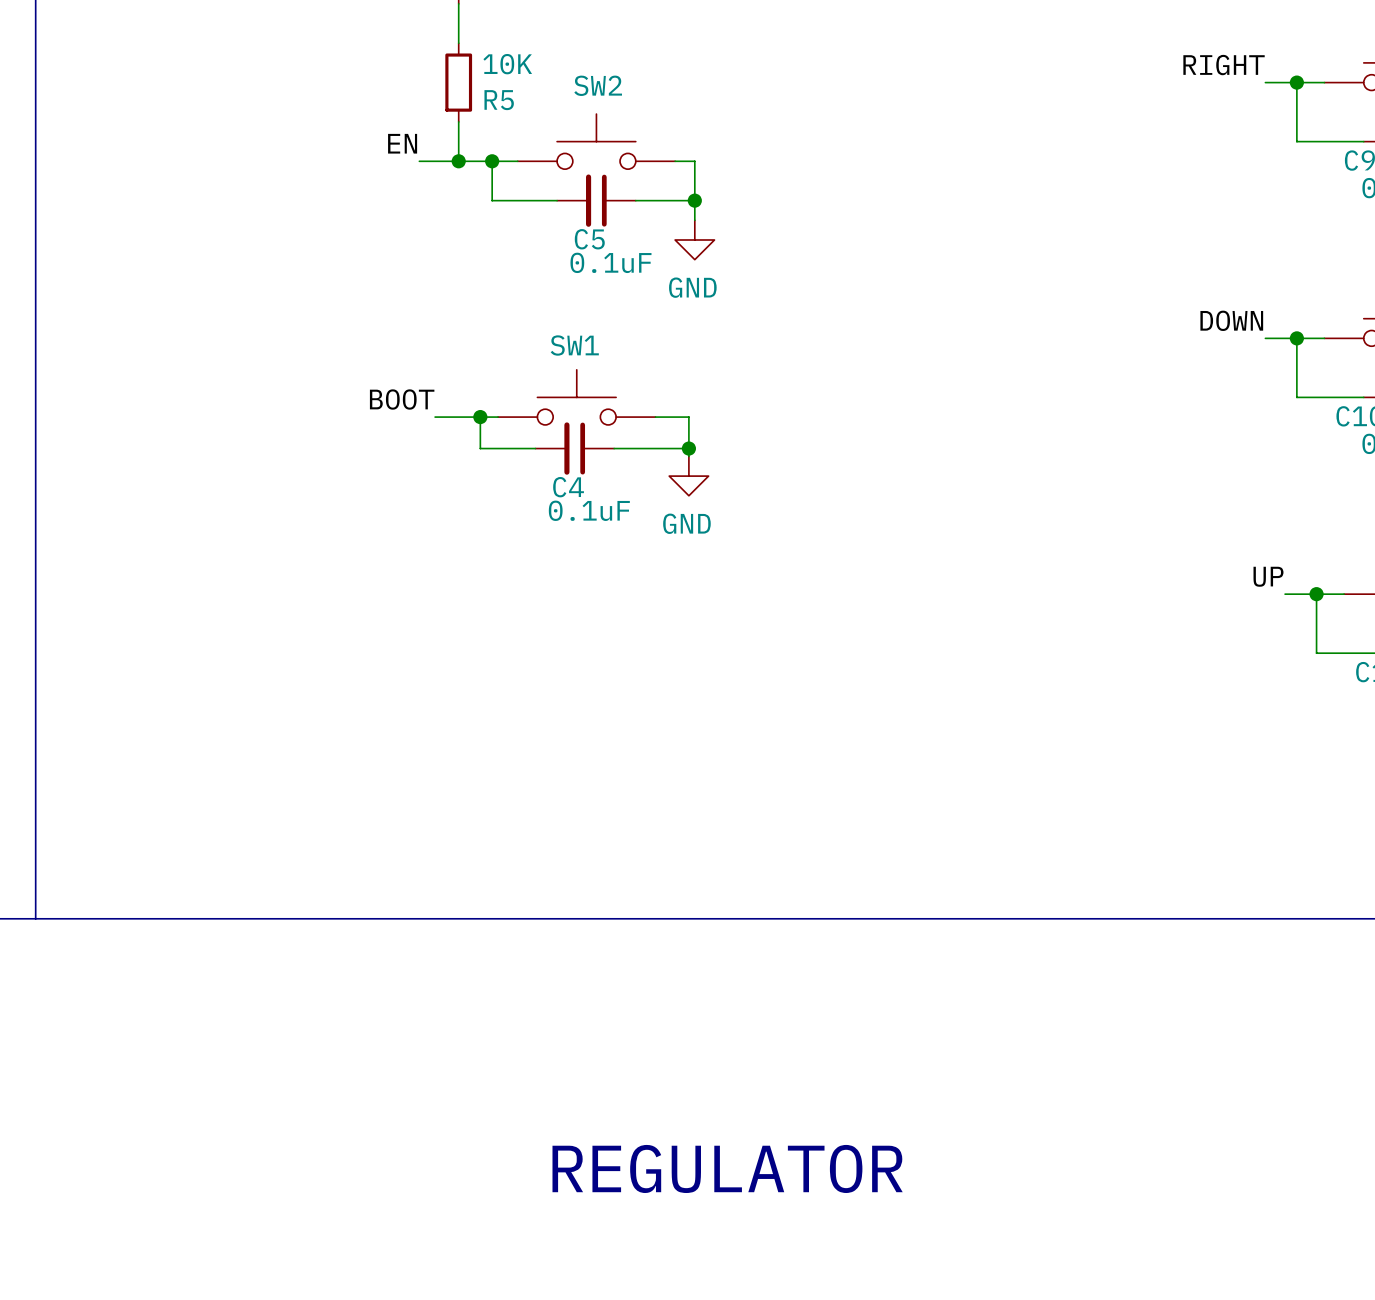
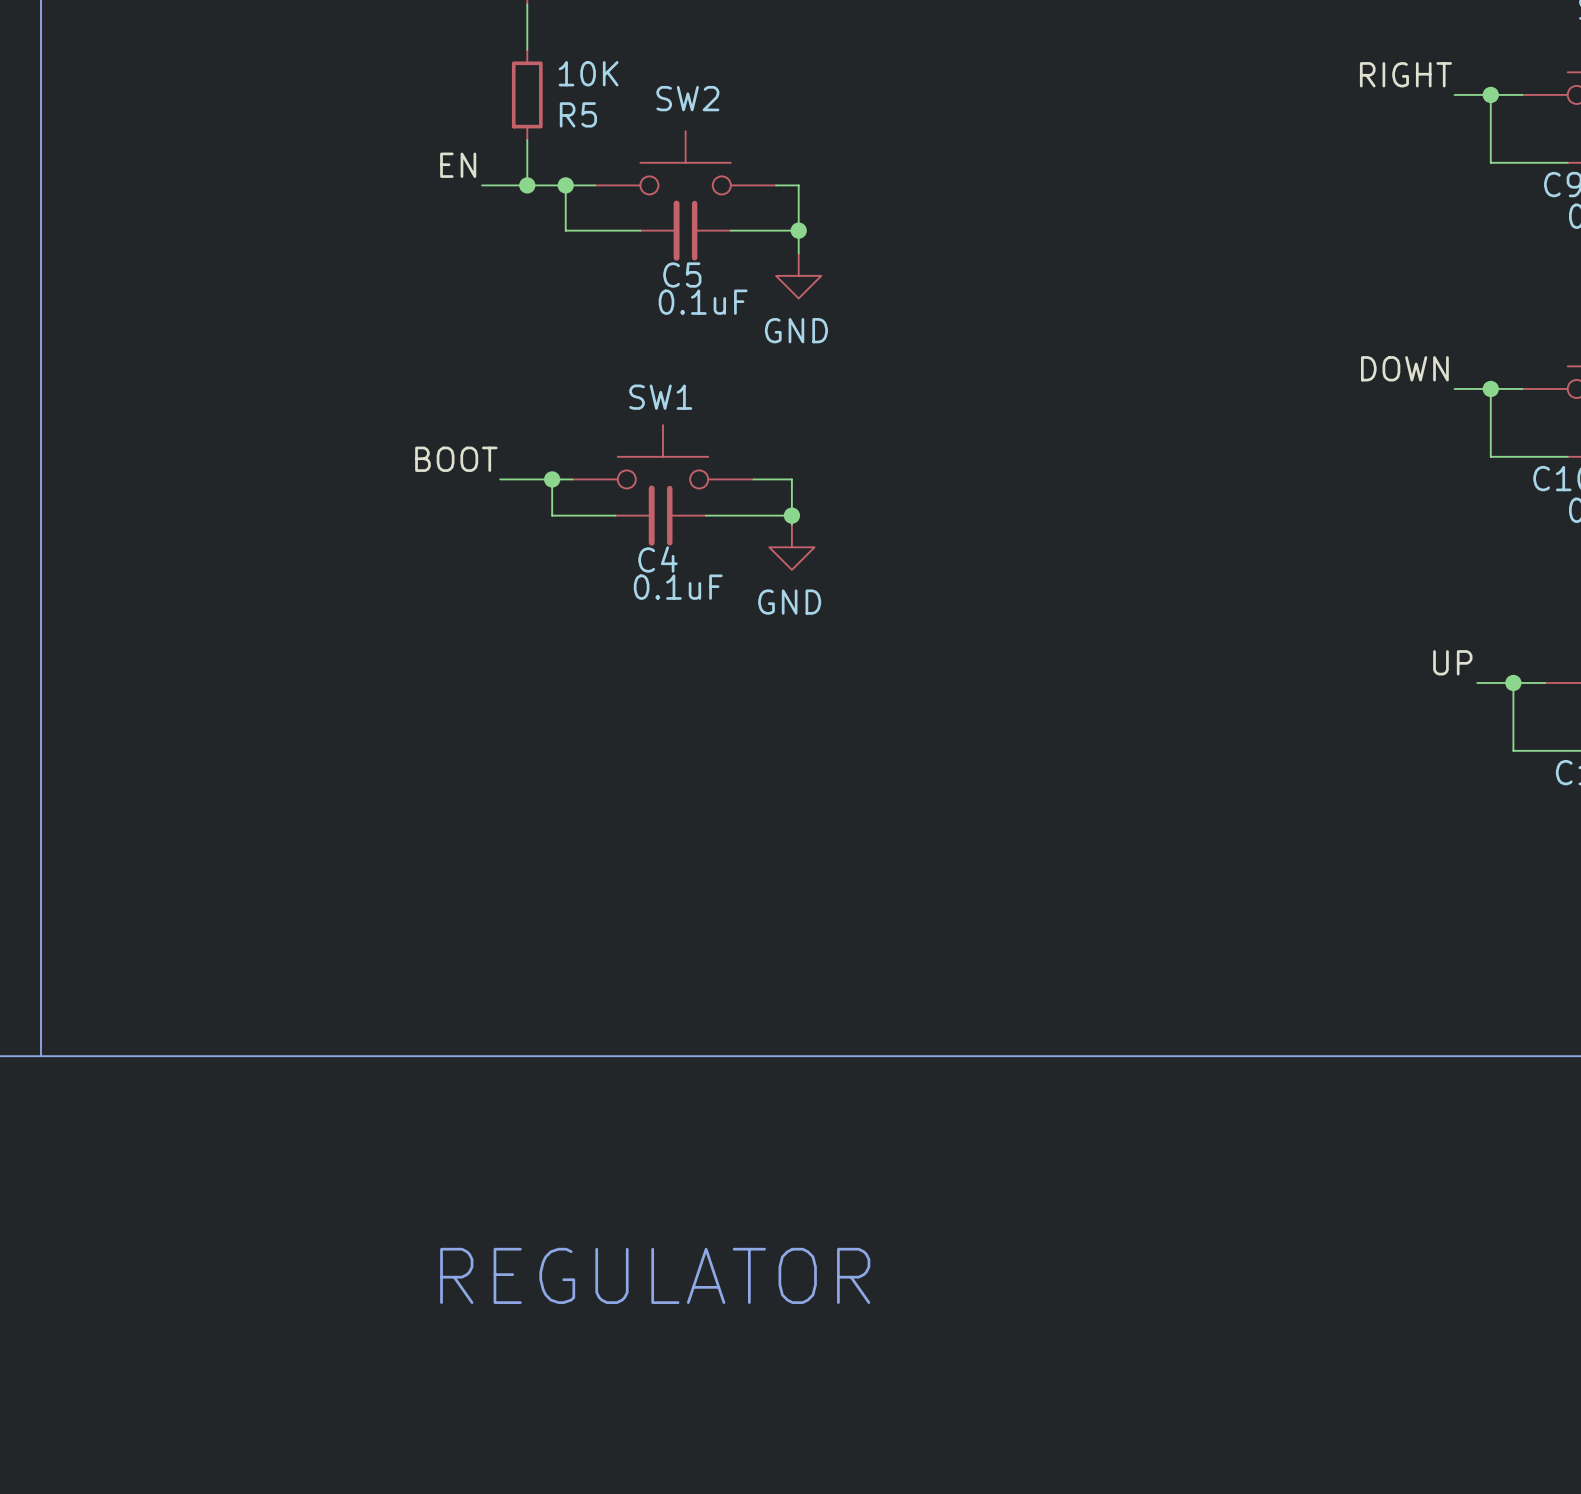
text position: REGULATOR (727, 1168) -> REGULATOR (655, 1275)

